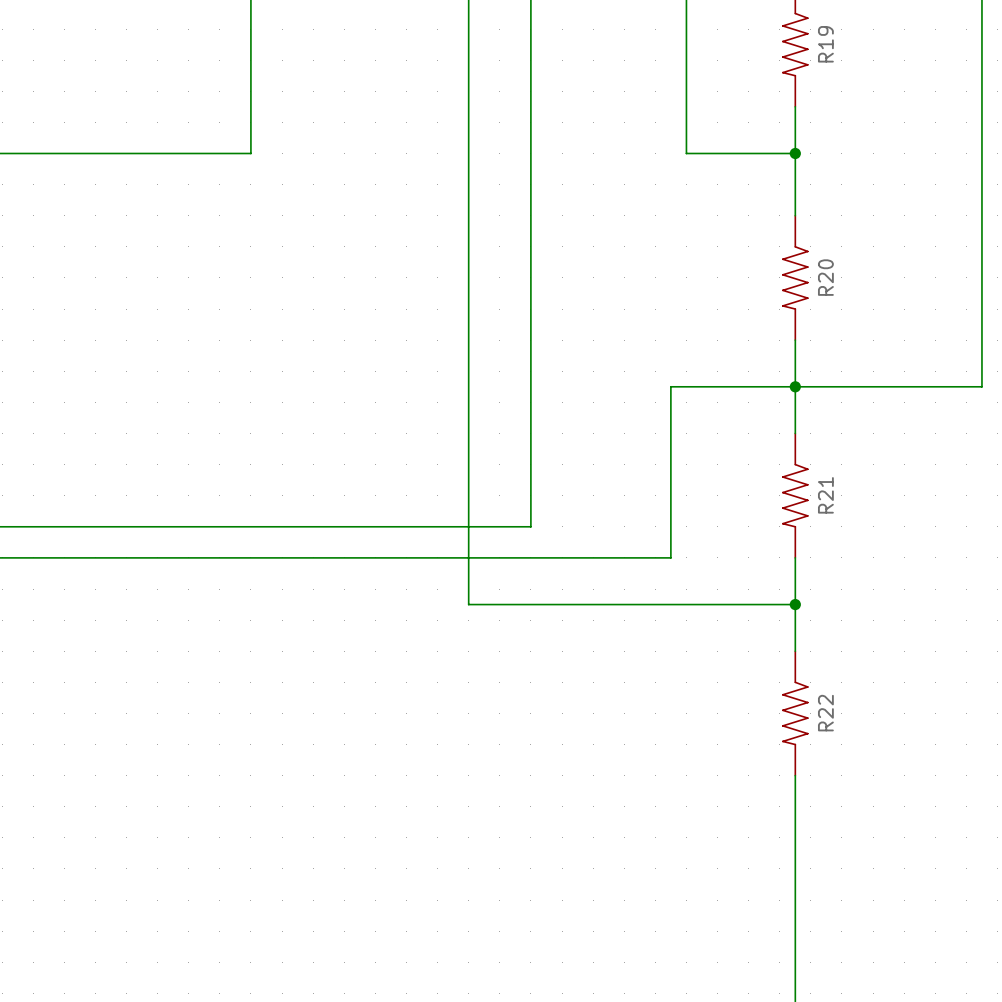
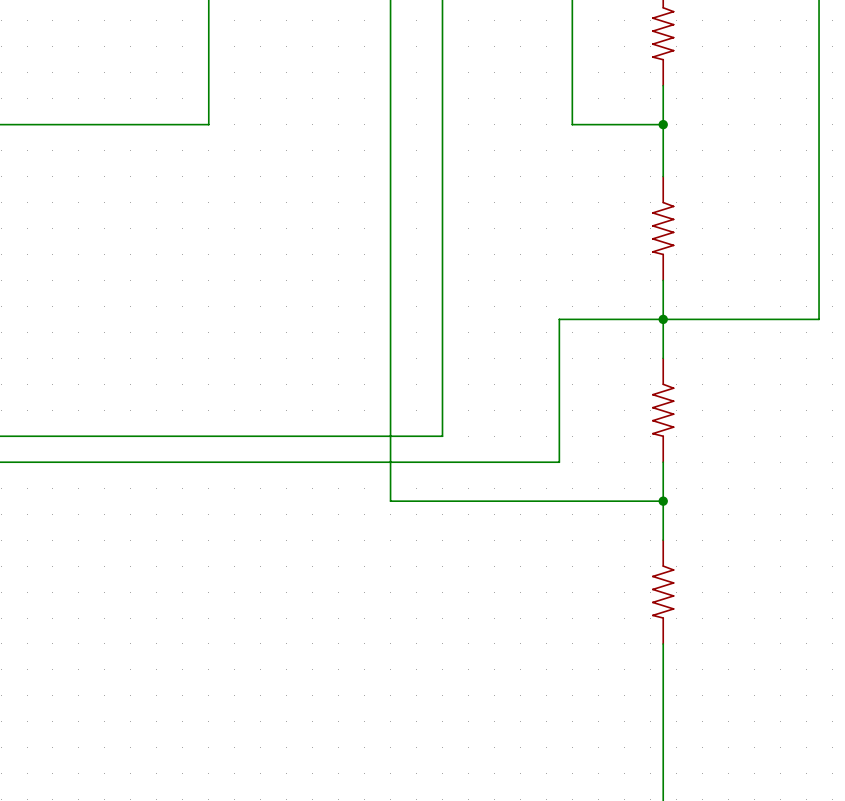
R19 name: R19 (825, 44) -> none
R20 name: R20 (825, 277) -> none
R21 name: R21 (825, 495) -> none
R22 name: R22 (825, 713) -> none

